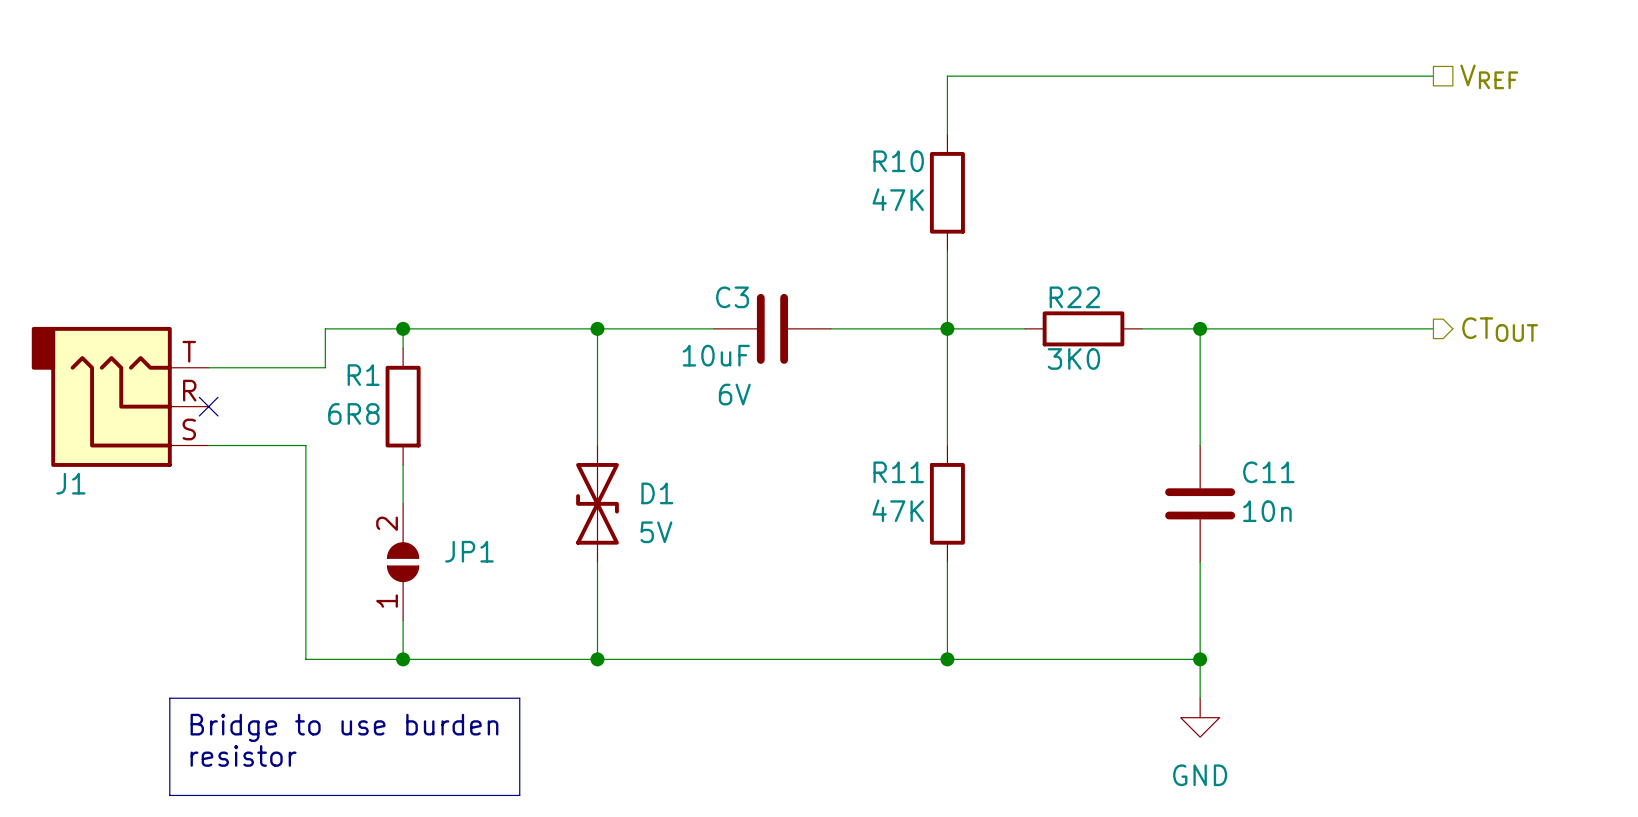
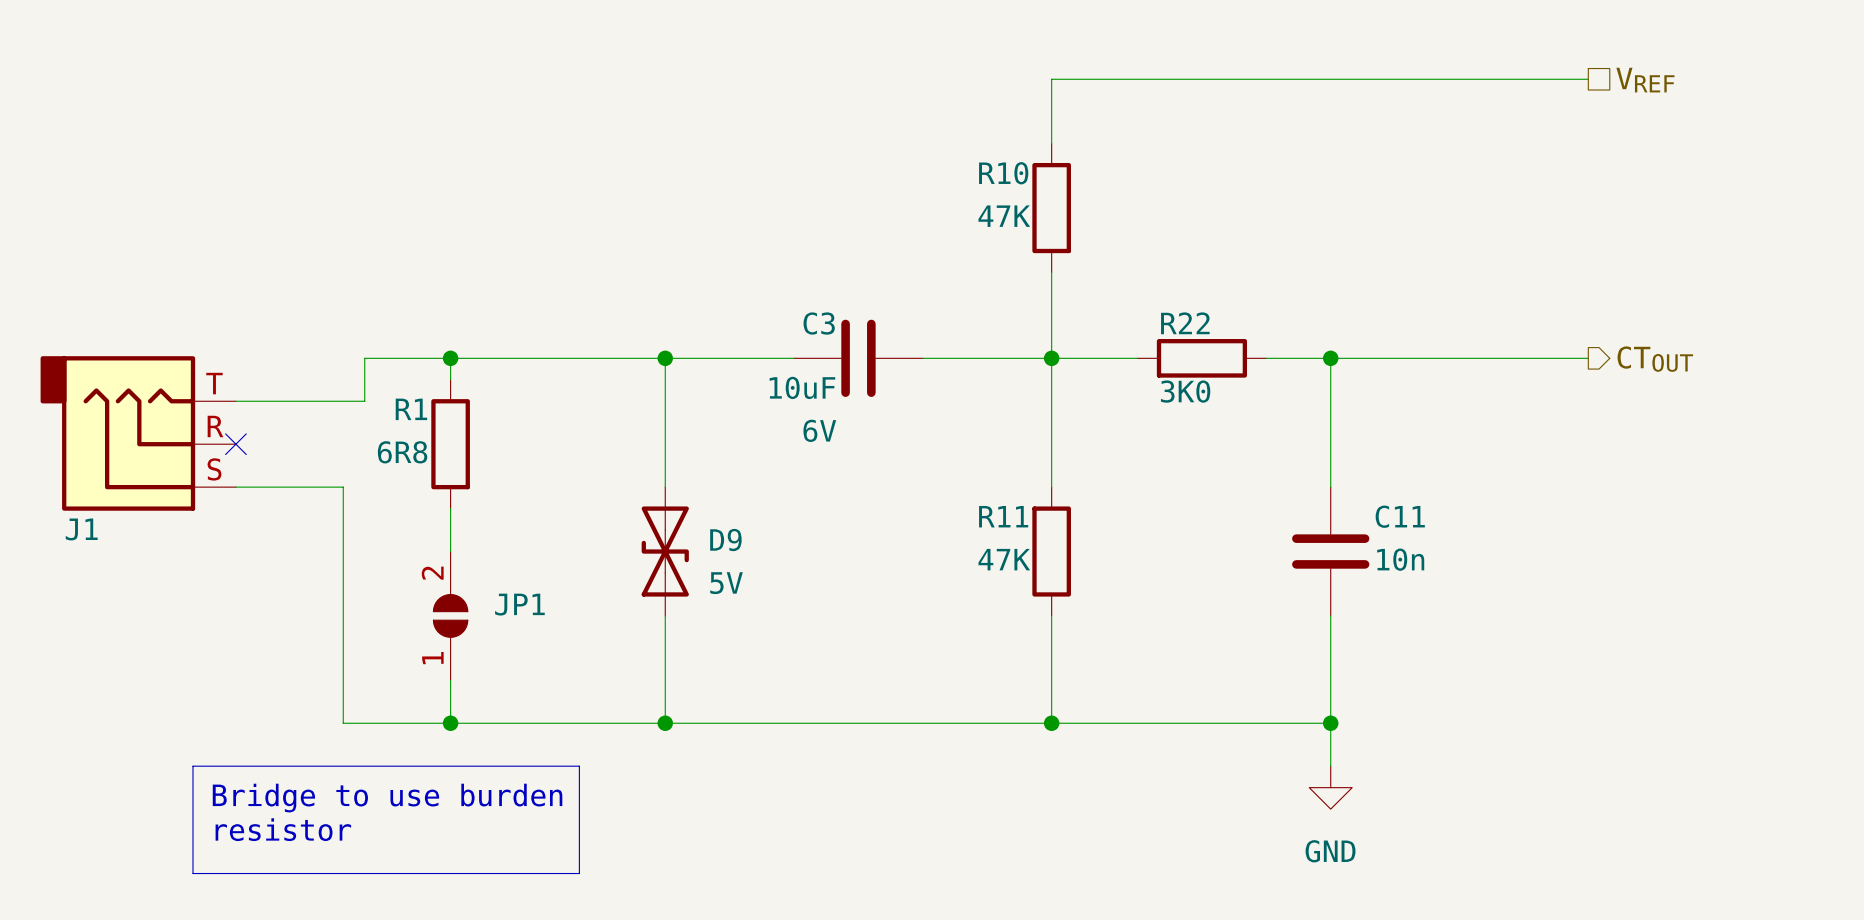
D1 name: D1 (657, 493) -> D9 (725, 540)

